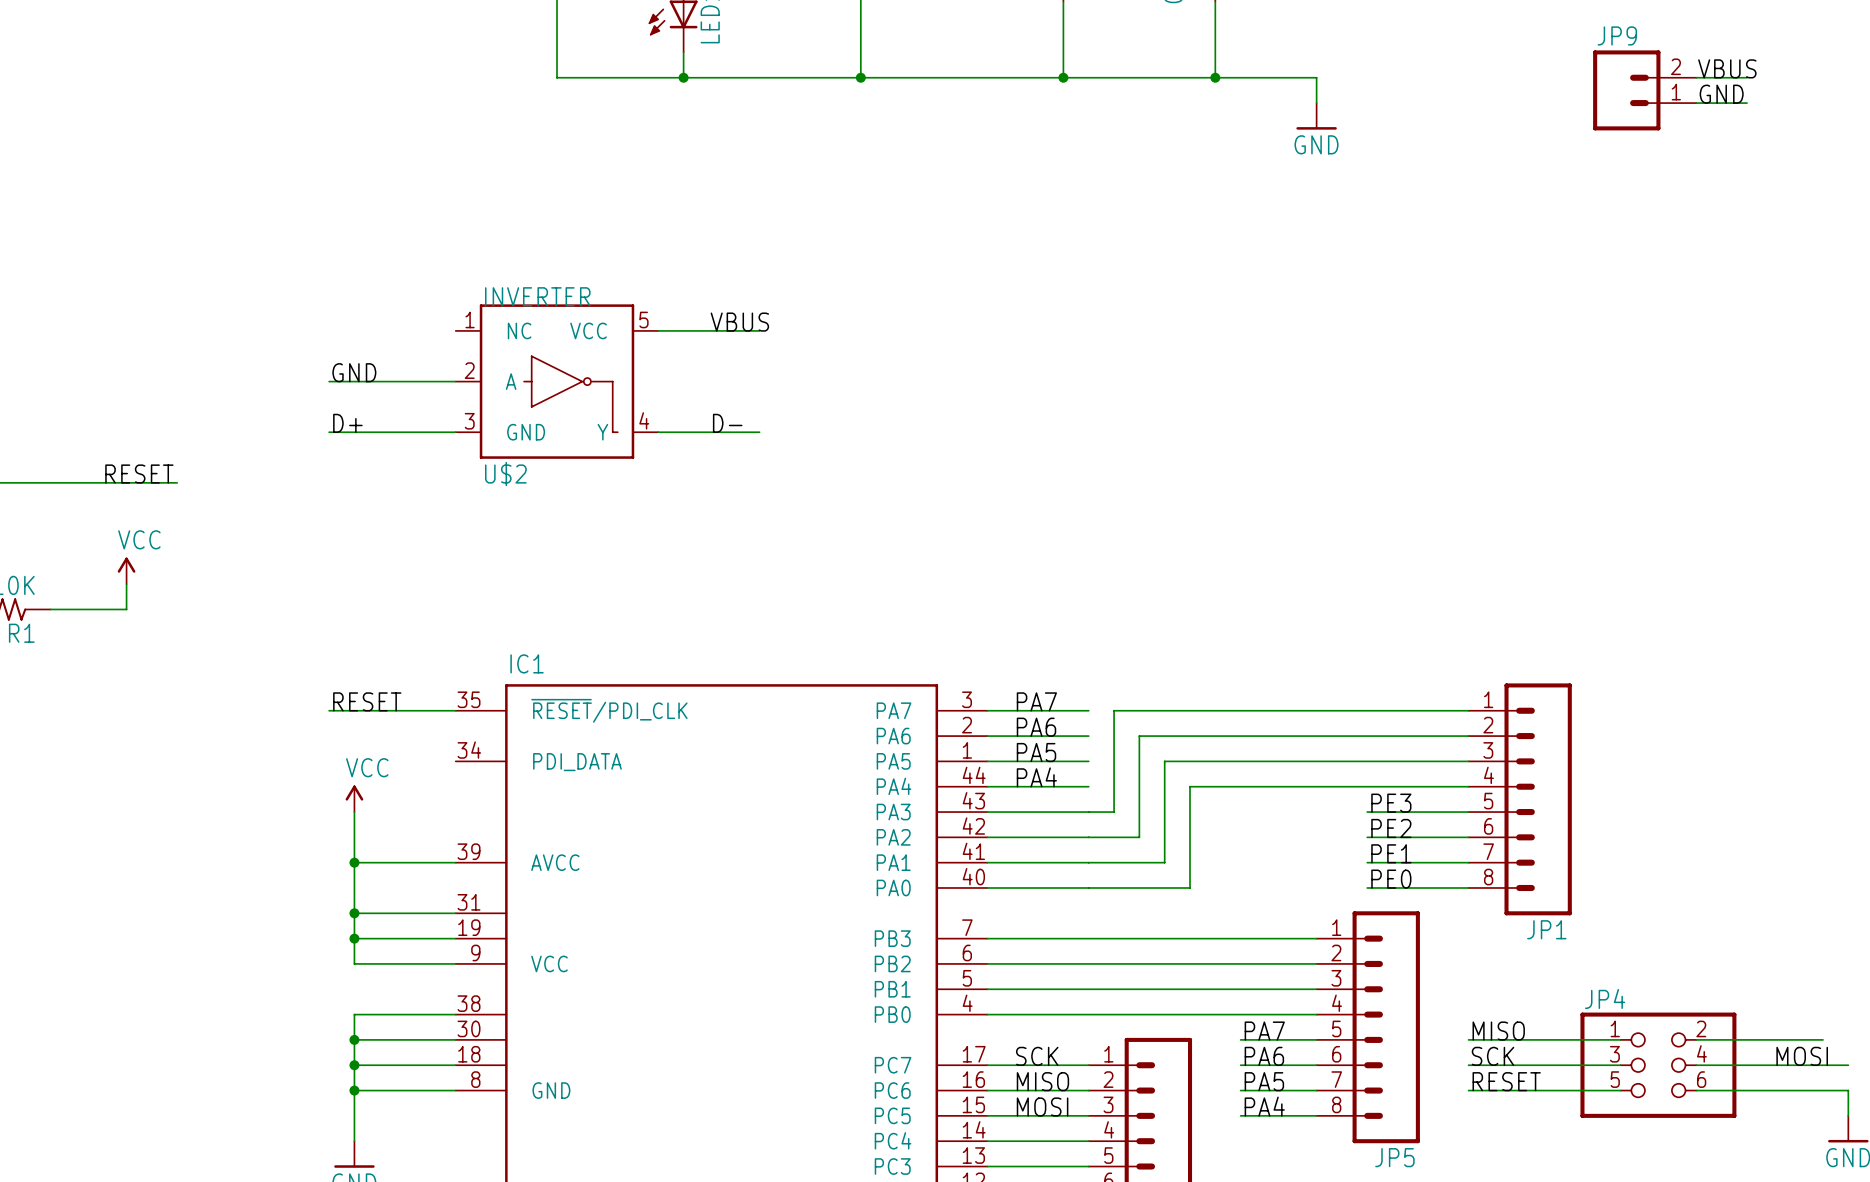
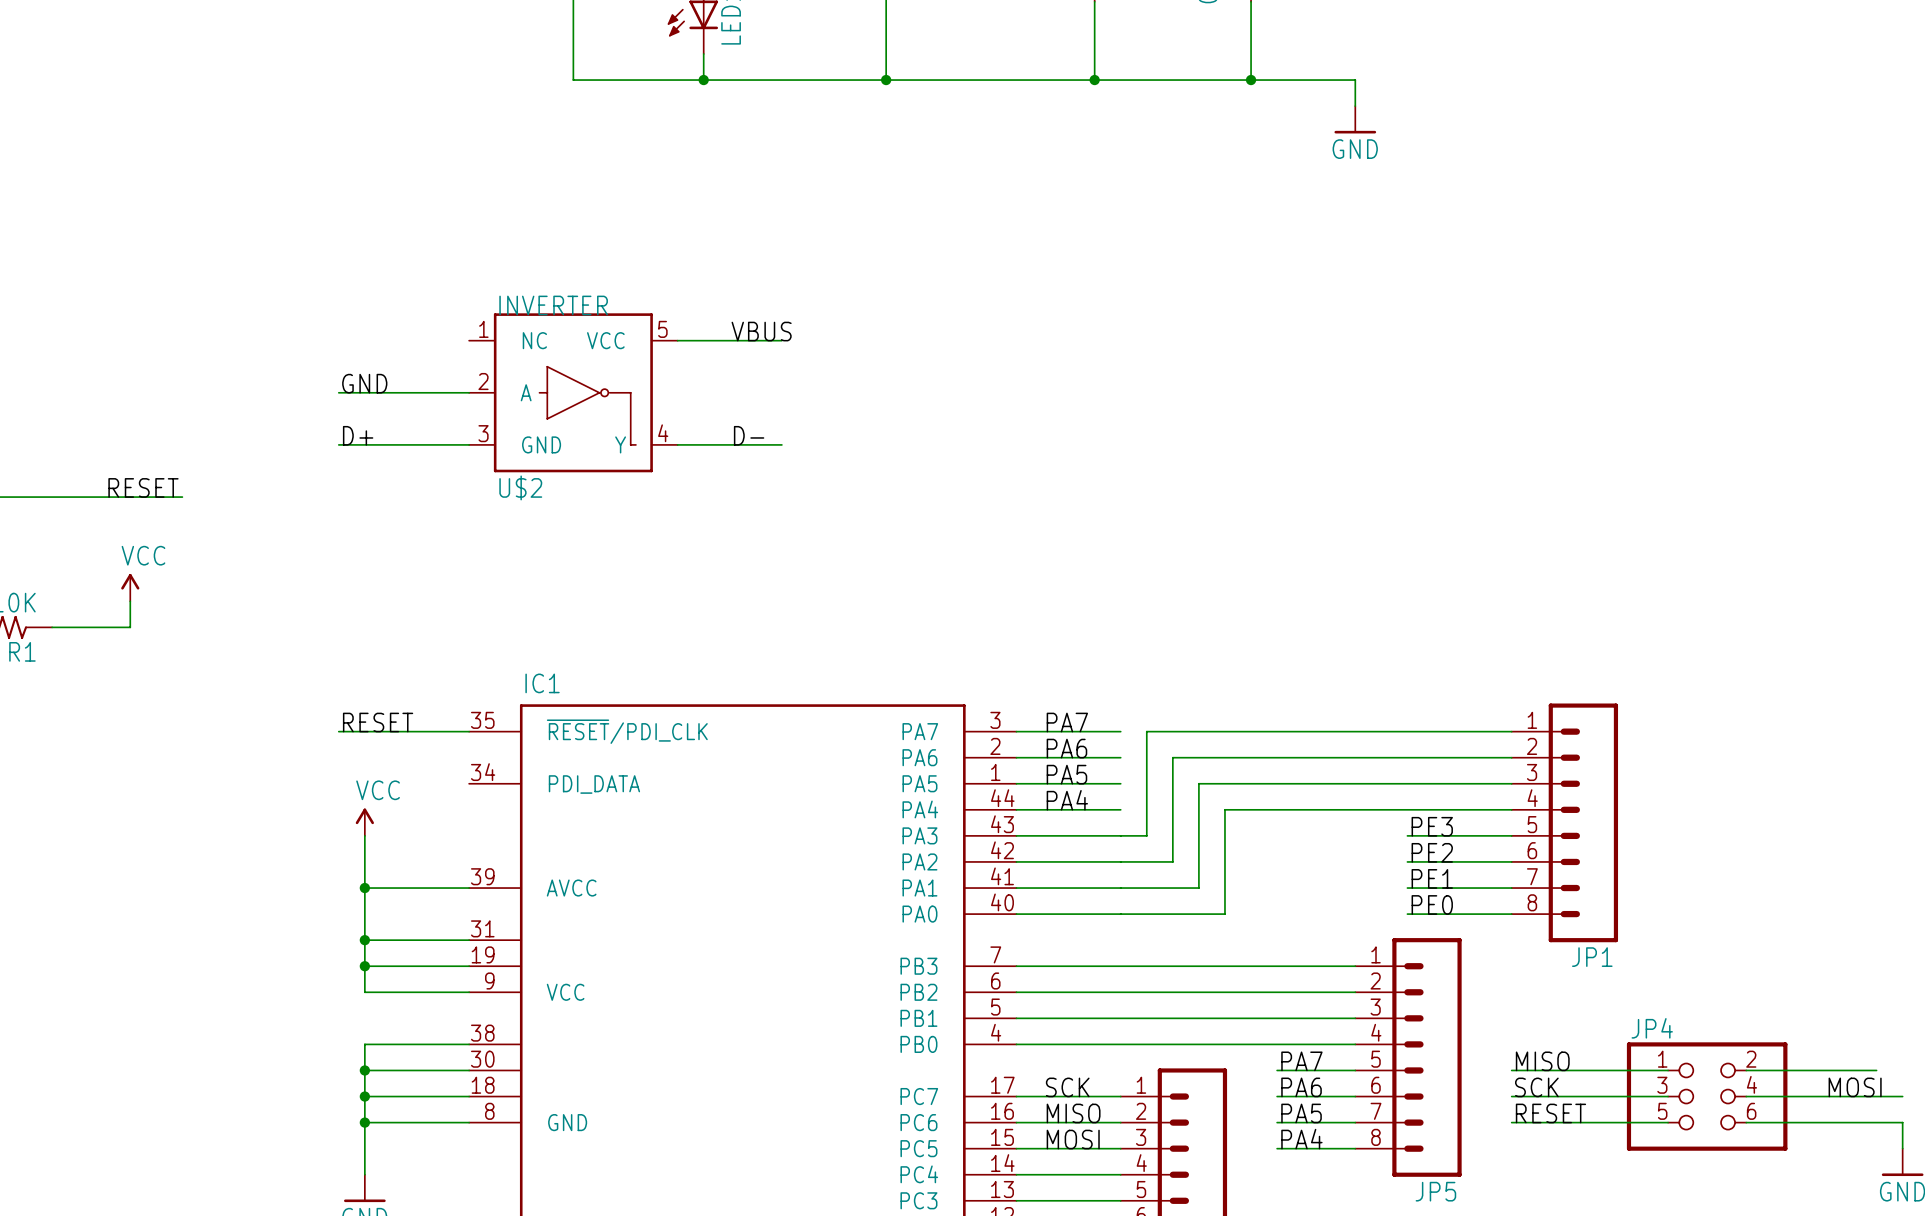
label: VBUS (1727, 68) -> none
wire: (1696, 77) (1747, 77) -> none
JP9: (1644, 90) -> none
label: GND (1721, 94) -> none
wire: (1696, 103) (1747, 103) -> none

